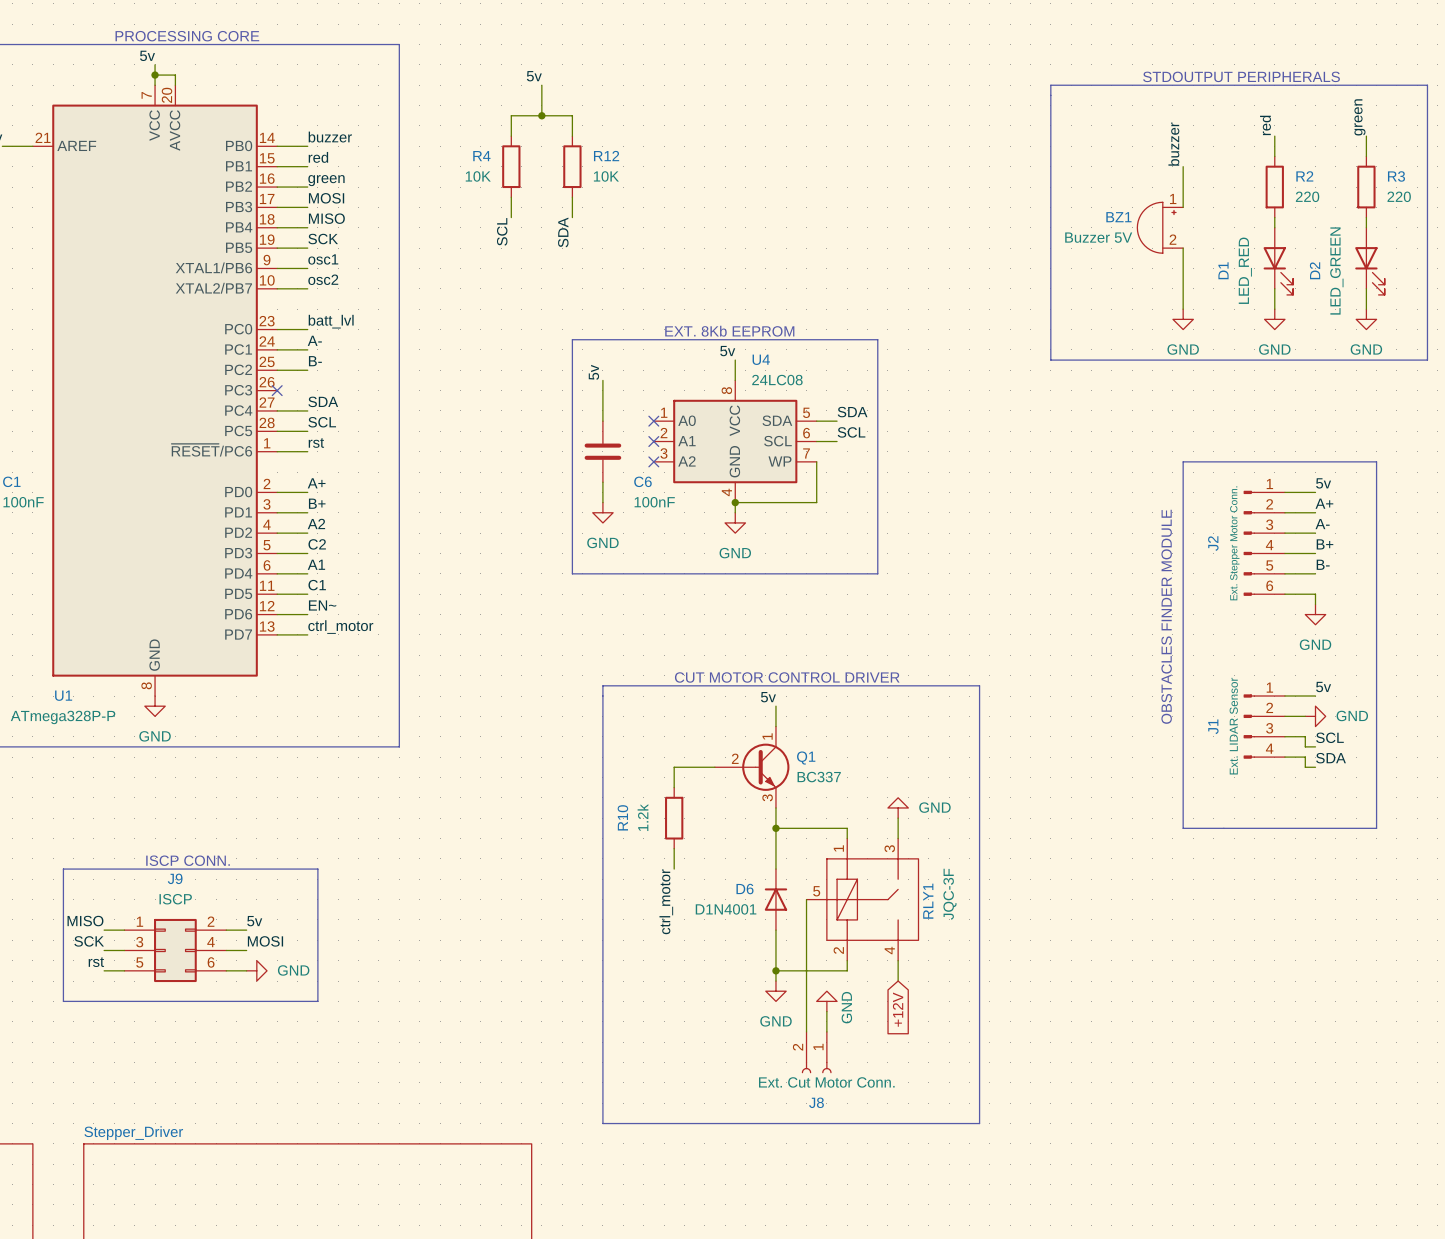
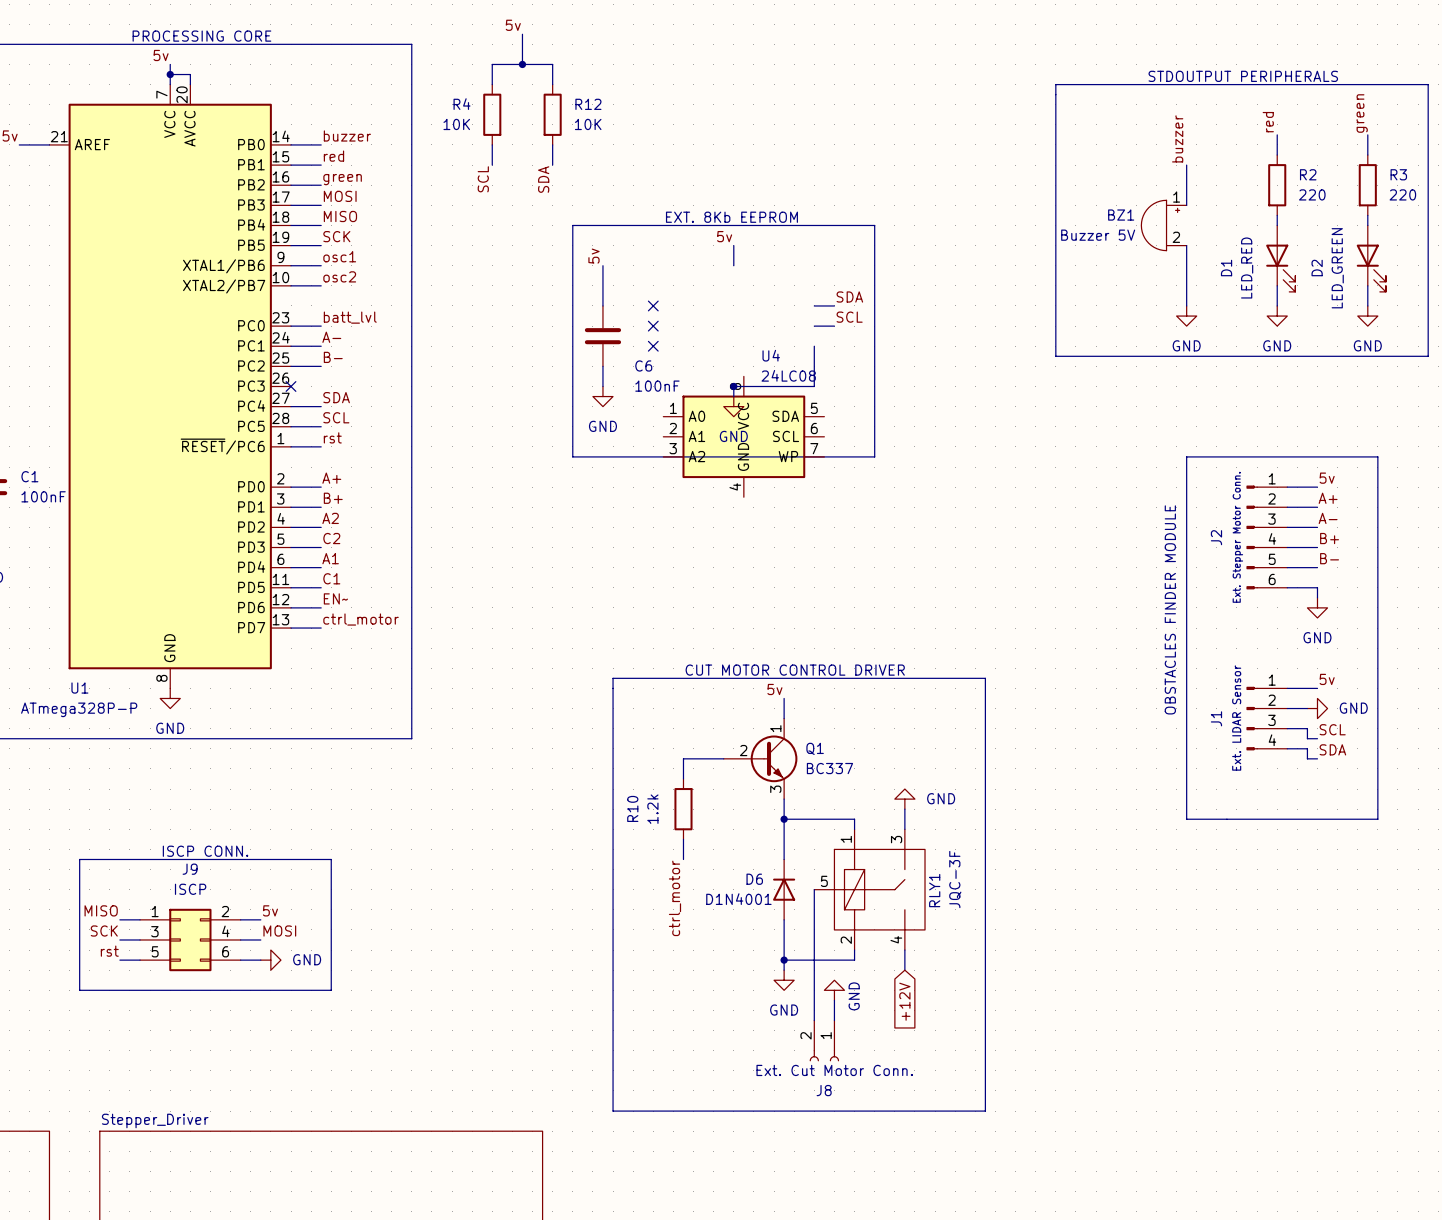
wire: none -> (522, 34) (522, 64)
junction: none -> (522, 64)
label position: 5v (534, 76) -> 5v (513, 25)
wire: (541, 85) (541, 115) -> (552, 84) (552, 64) (492, 64) (492, 84)
junction: (541, 115) -> none
wire: (511, 136) (511, 115) (572, 115) (572, 136) -> none
R4 position: (511, 166) -> (492, 114)
R12 position: (572, 166) -> (552, 114)
wire: (511, 197) (511, 217) -> (492, 144) (492, 165)
wire: (572, 197) (572, 217) -> (552, 144) (552, 165)
label position: SCL (502, 231) -> SCL (483, 179)
label position: SDA (563, 232) -> SDA (543, 179)
label: none -> 5v (724, 236)
label: none -> 5v (593, 256)
no-connect mark: none -> (653, 305)
no-connect mark: none -> (653, 326)
text position: EXT. 8Kb EEPROM (729, 331) -> EXT. 8Kb EEPROM (731, 217)
line: (572, 339) (572, 573) (877, 573) (877, 339) (572, 339) -> (572, 225) (572, 456) (874, 456) (874, 225) (572, 225)
no-connect mark: none -> (653, 346)
label: 5v (727, 351) -> none
wire: (735, 360) (735, 380) -> (733, 245) (733, 265)
label: 5v (593, 372) -> none
wire: (602, 380) (602, 421) -> (602, 265) (602, 305)
junction: none -> (733, 386)
power symbol: none -> GND (602, 396)
power symbol: none -> GND (733, 406)
label position: SDA (852, 412) -> SDA (849, 297)
no-connect mark: (653, 421) -> none
wire: (816, 421) (837, 421) -> (814, 305) (834, 305)
label position: SCL (851, 432) -> SCL (849, 317)
no-connect mark: (653, 441) -> none
wire: (816, 441) (837, 441) -> (814, 326) (834, 326)
C6 position: (602, 451) -> (602, 336)
no-connect mark: (653, 461) -> none
wire: (816, 461) (816, 502) (735, 502) (735, 512) -> (814, 346) (814, 386) (733, 386) (733, 396)
wire: (602, 482) (602, 502) -> (602, 366) (602, 386)
junction: (735, 502) -> none
power symbol: GND (602, 512) -> none
power symbol: GND (735, 522) -> none

